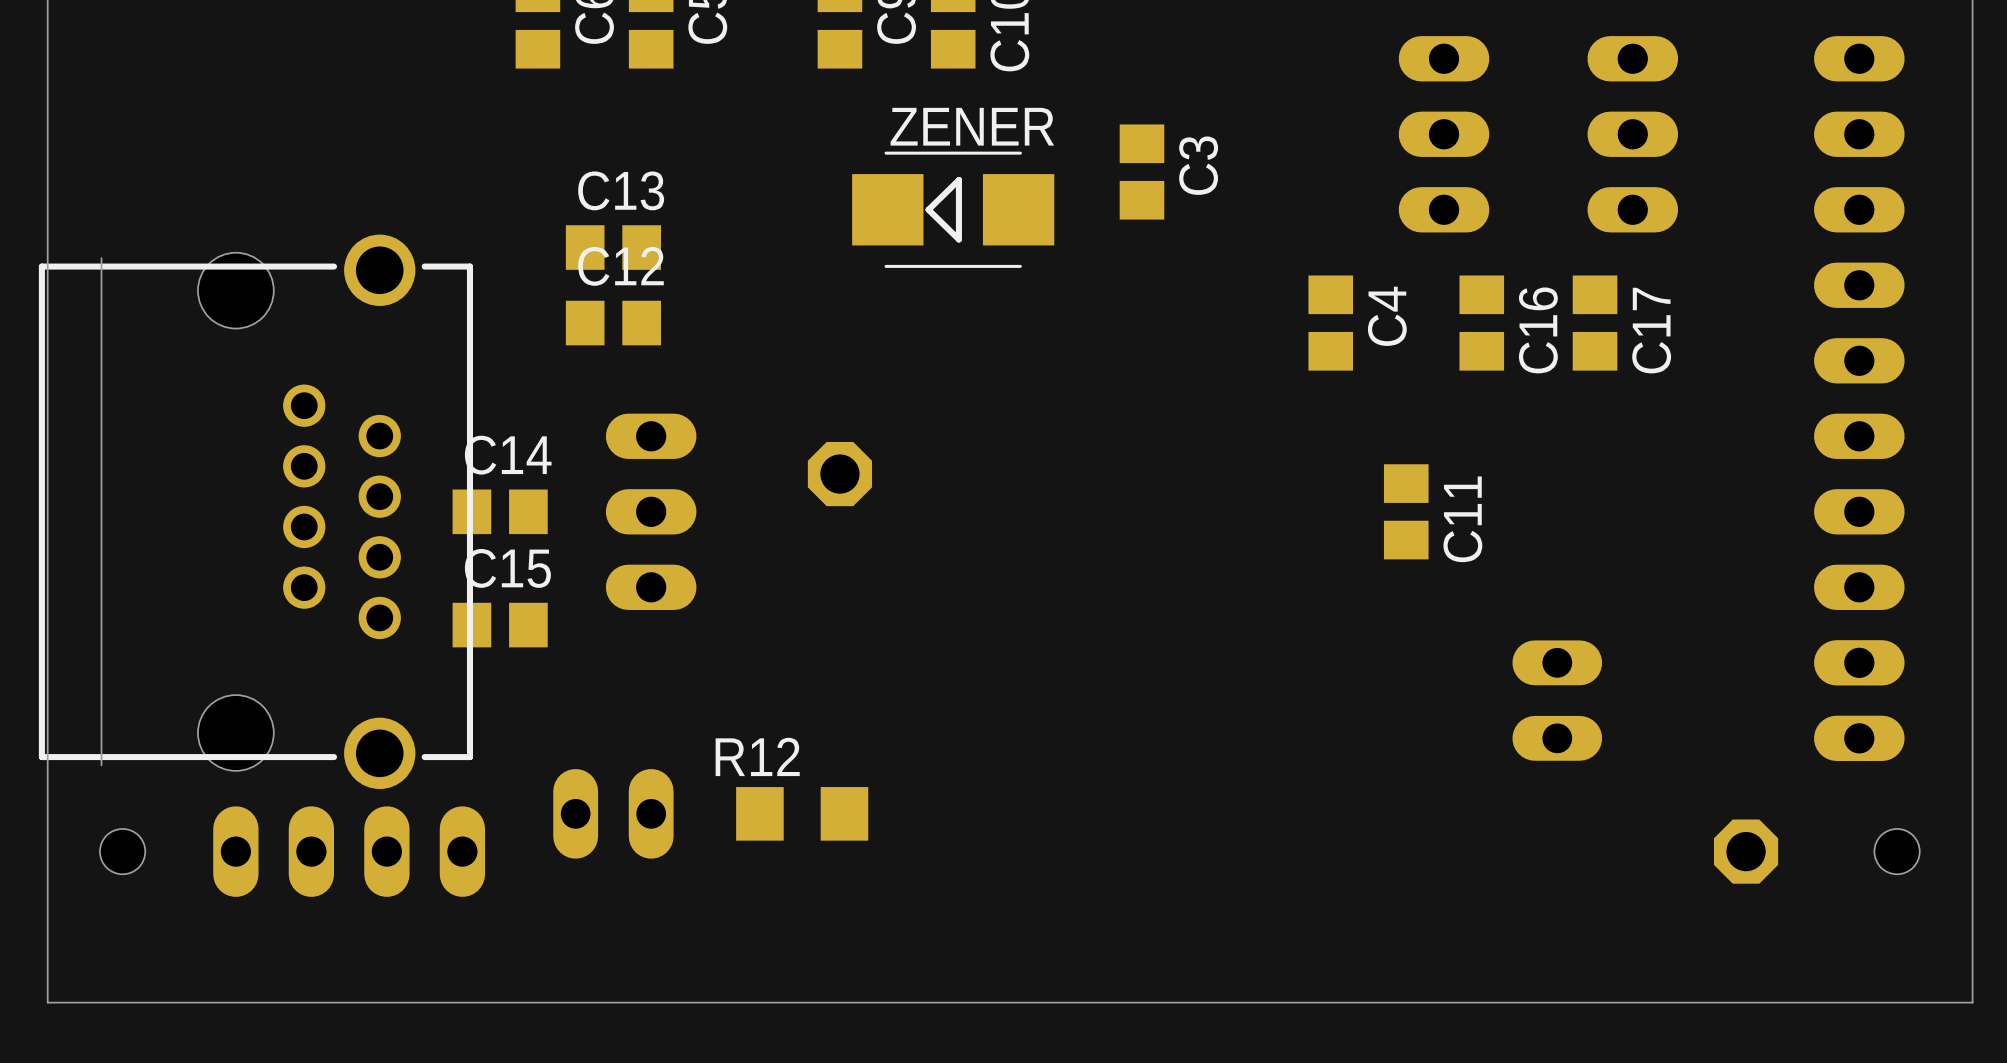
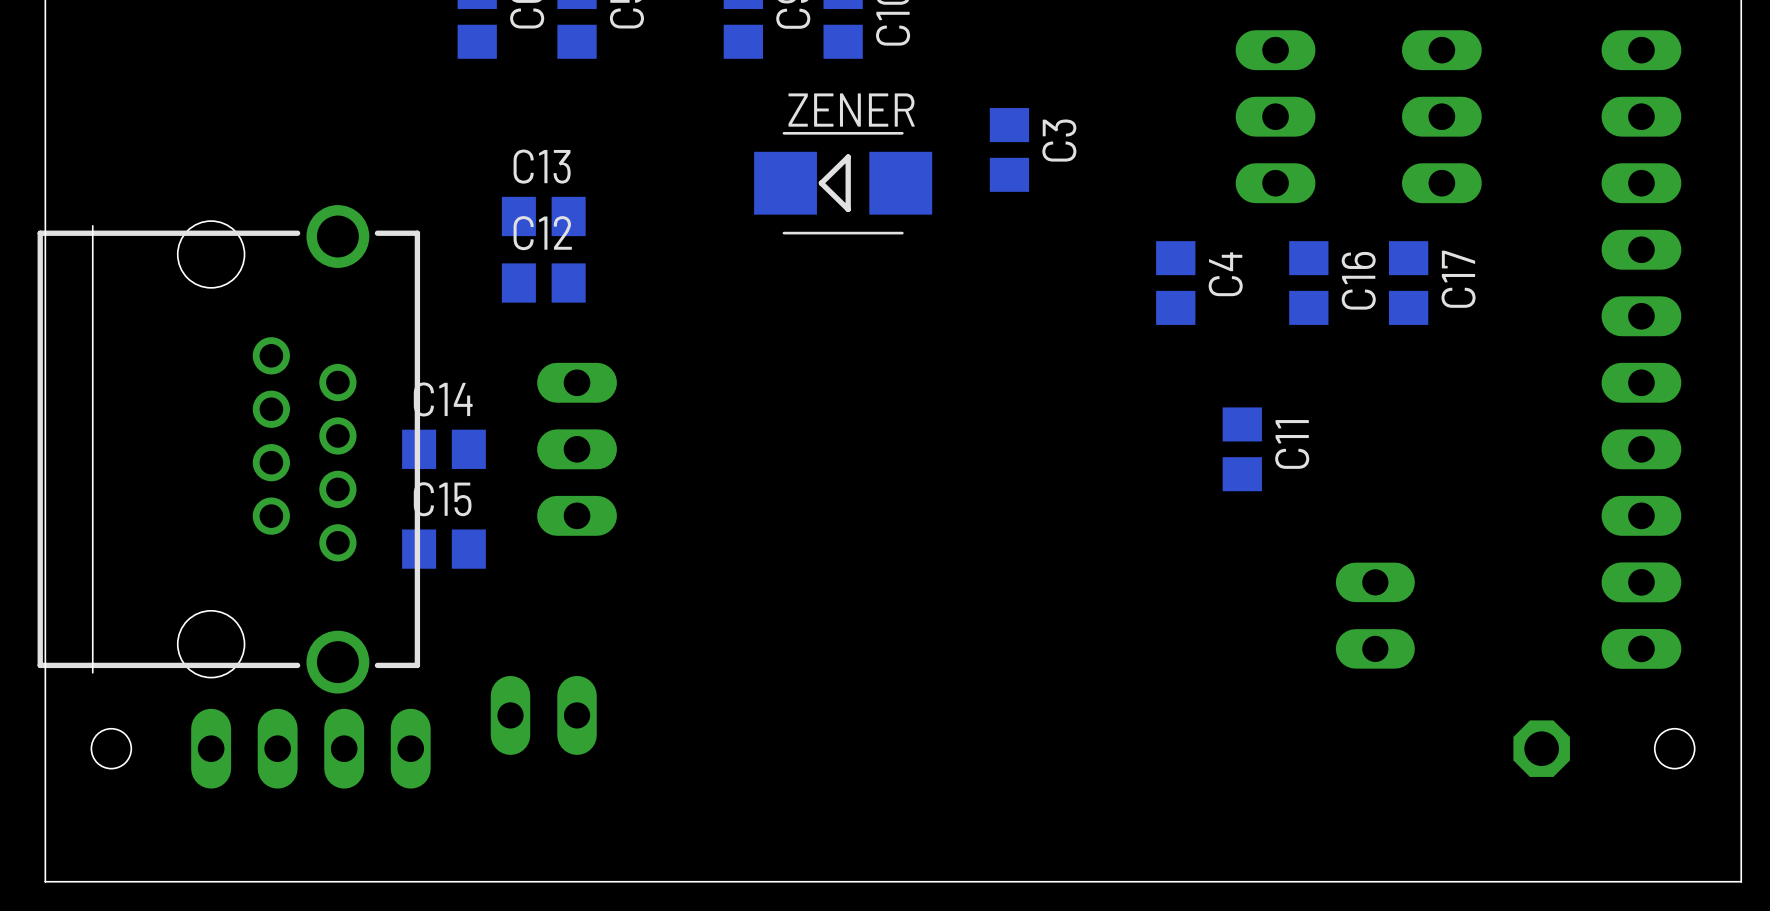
part: (839, 474) -> none
R12: (802, 813) -> none

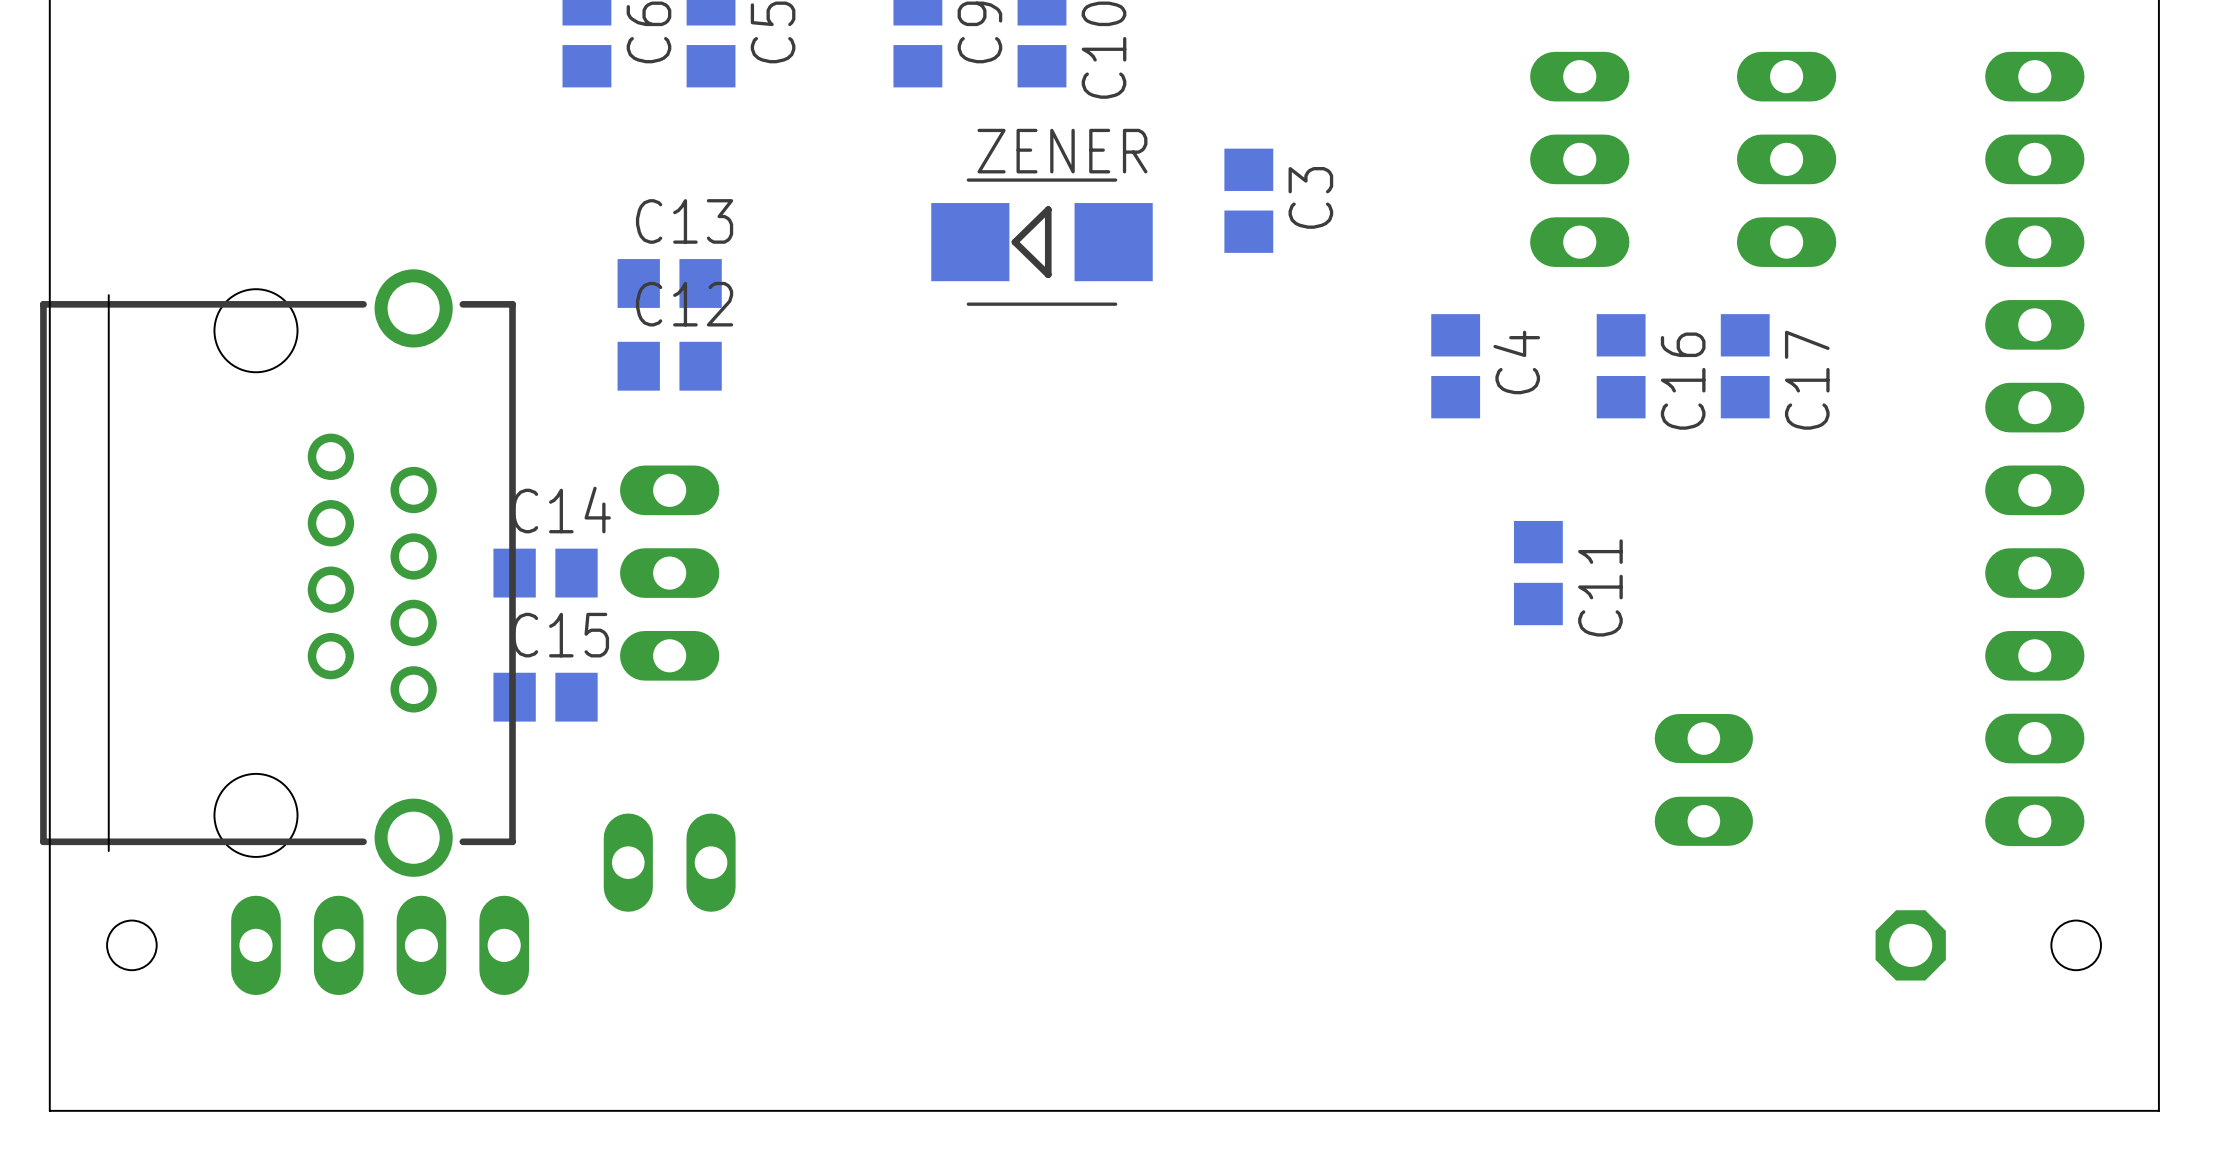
part position: (577, 449) -> (669, 573)
part position: (543, 715) -> (669, 862)

